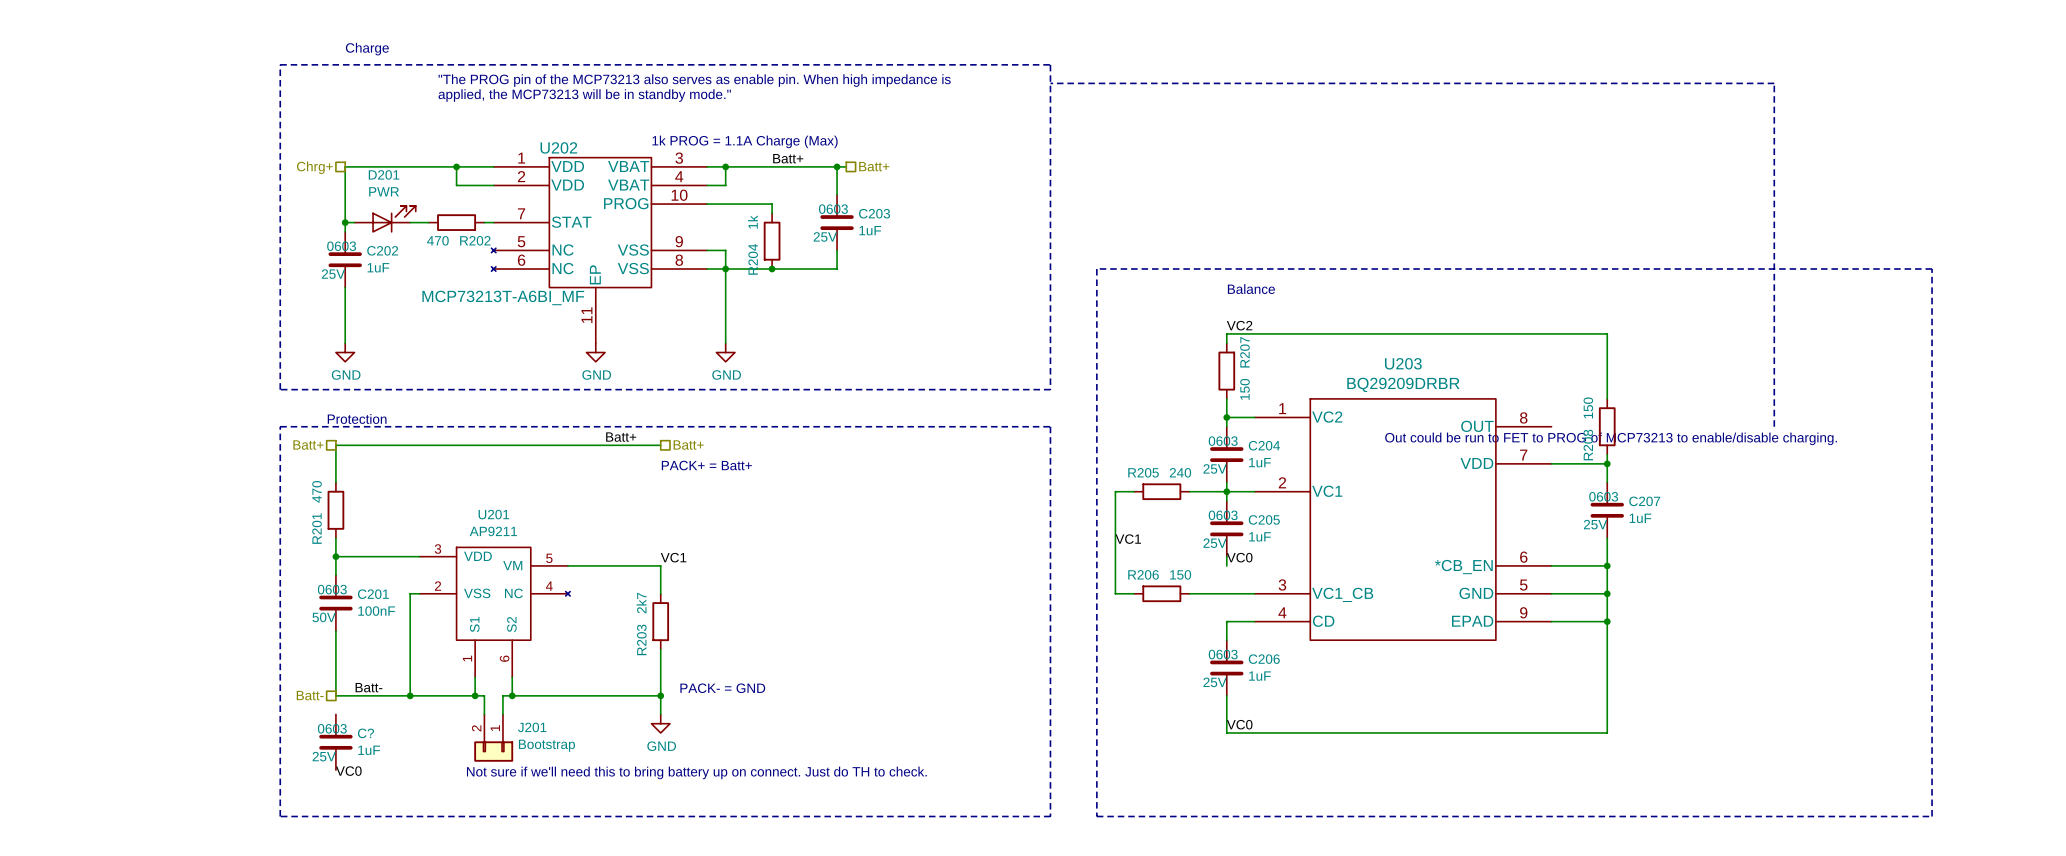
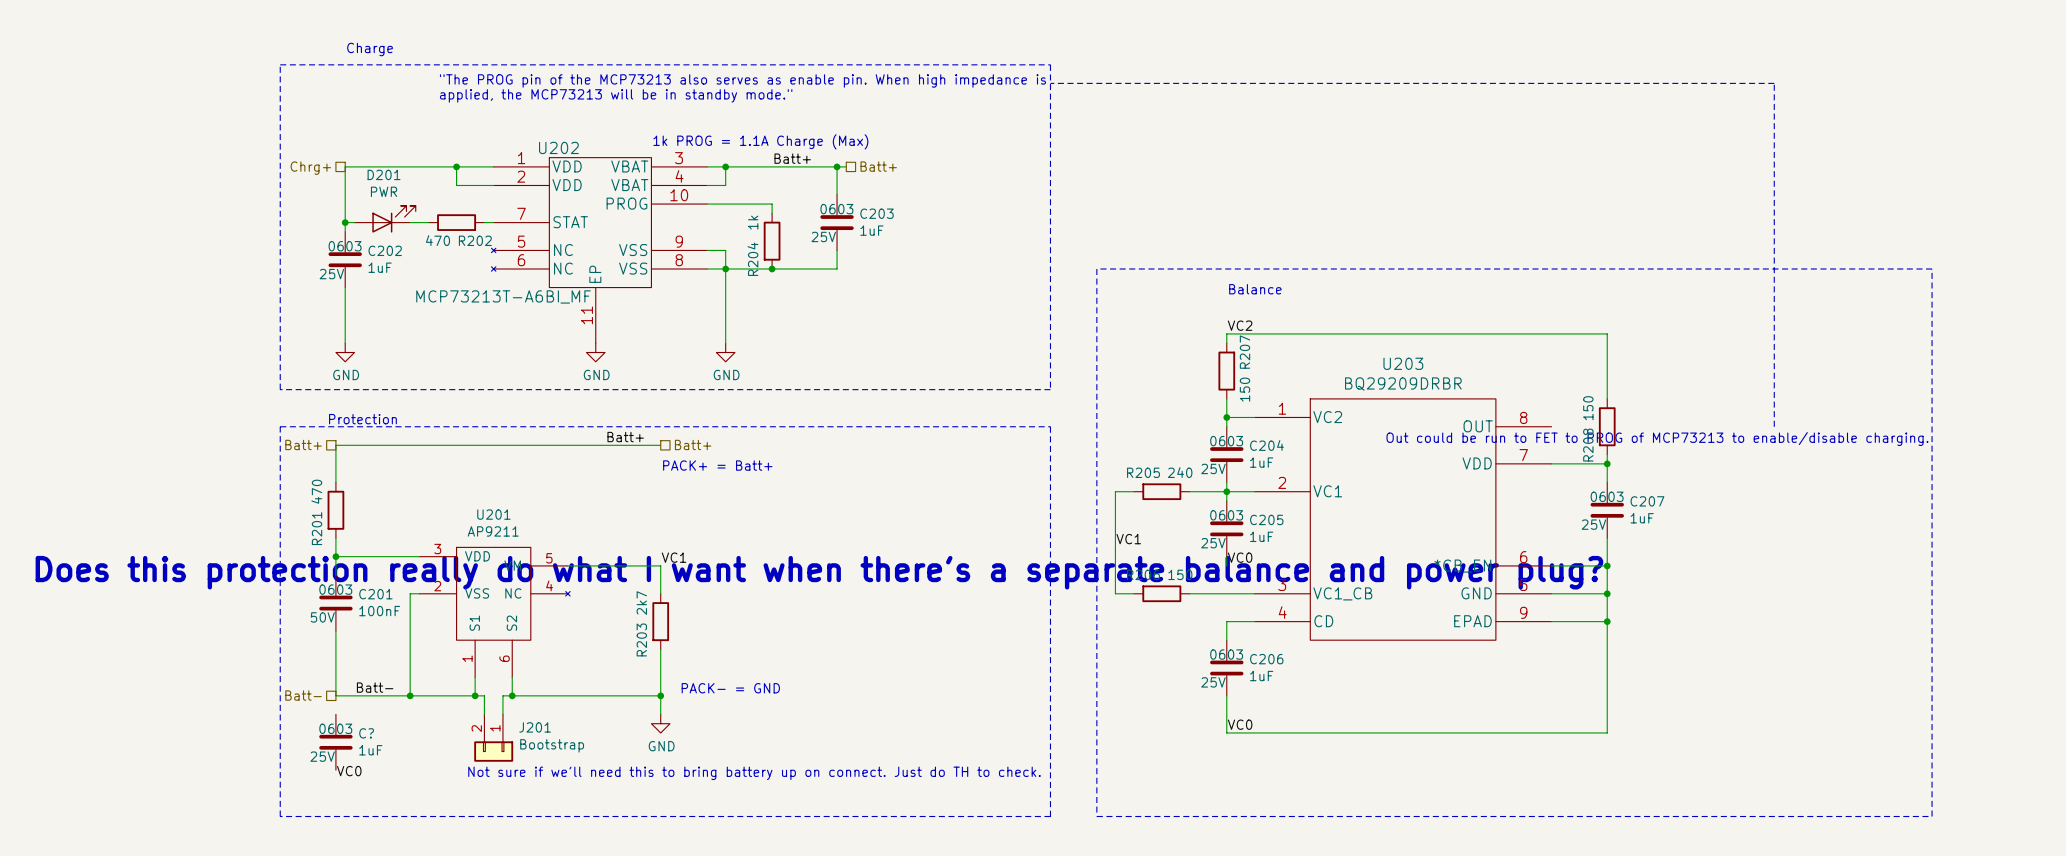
text: none -> Does this protection really do what I want when there's a separate balance and power plug? (819, 572)

